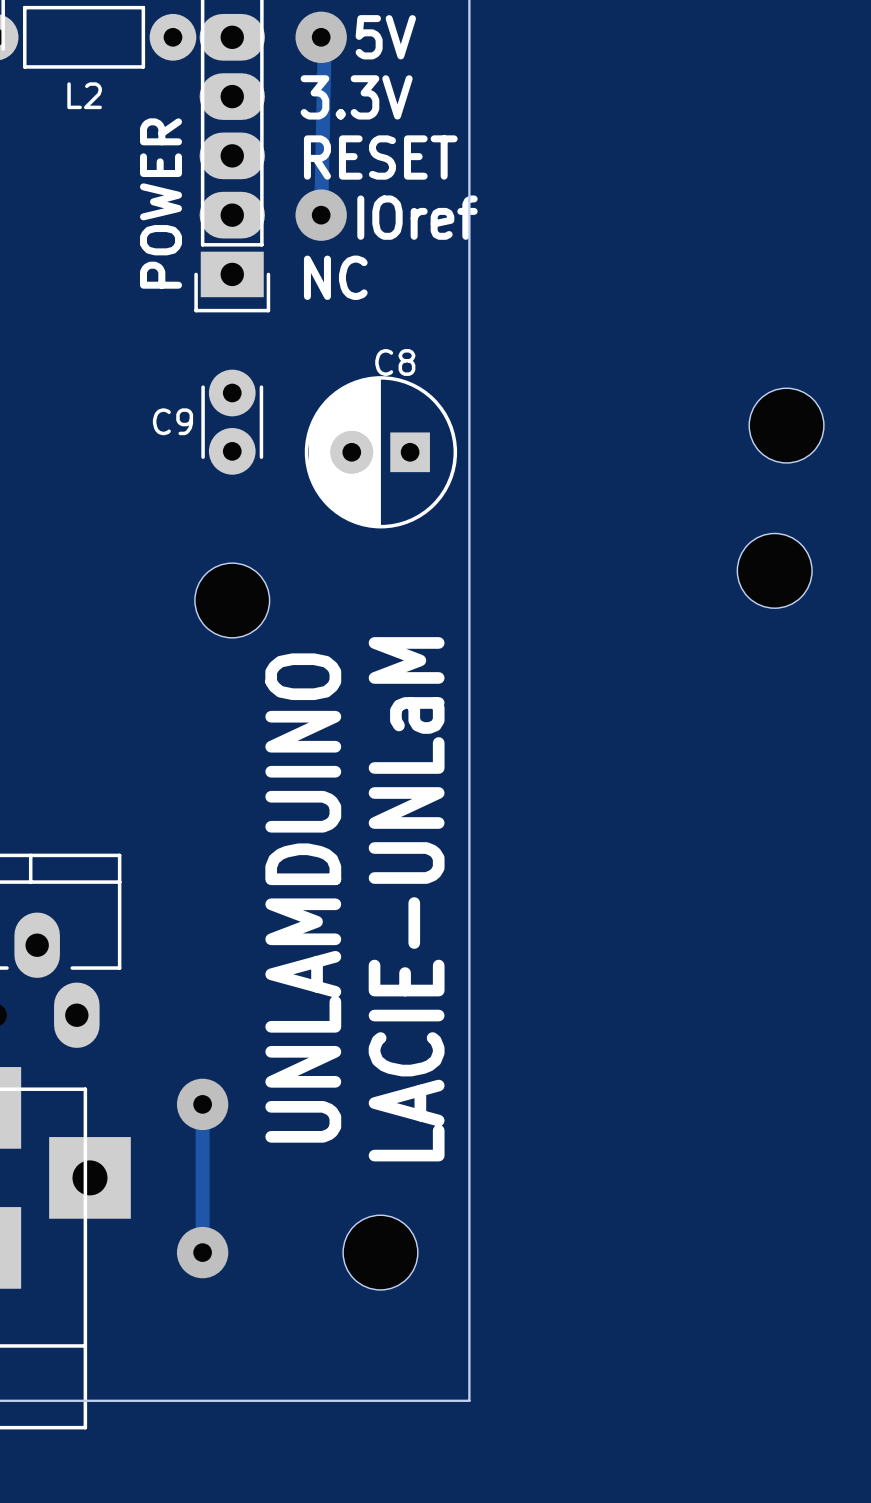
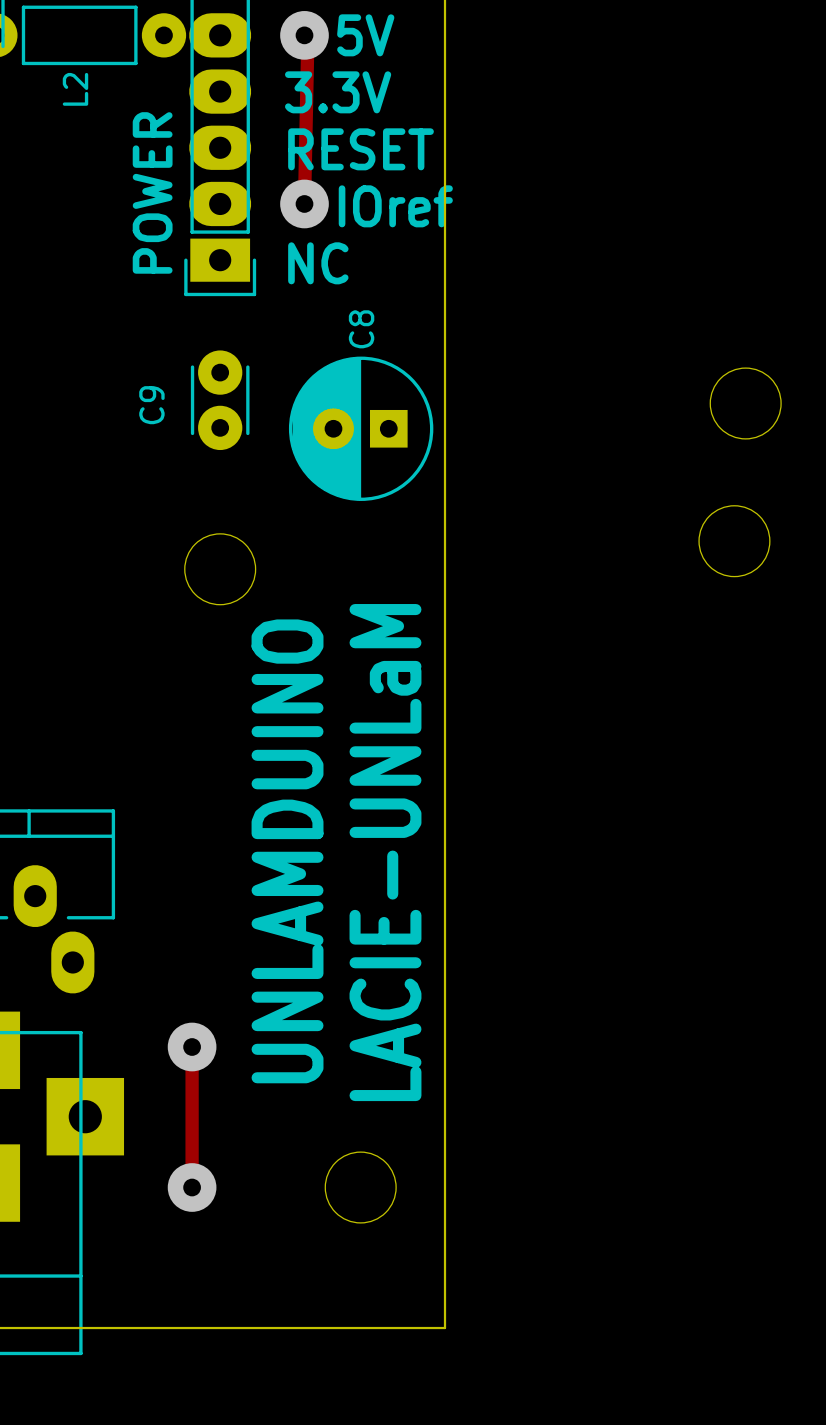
L2 name rotation: 0° (84, 95) -> 90° counterclockwise (75, 89)
C8 name rotation: 0° (395, 362) -> 90° counterclockwise (361, 329)
C9 name rotation: 0° (172, 421) -> 90° counterclockwise (151, 405)

